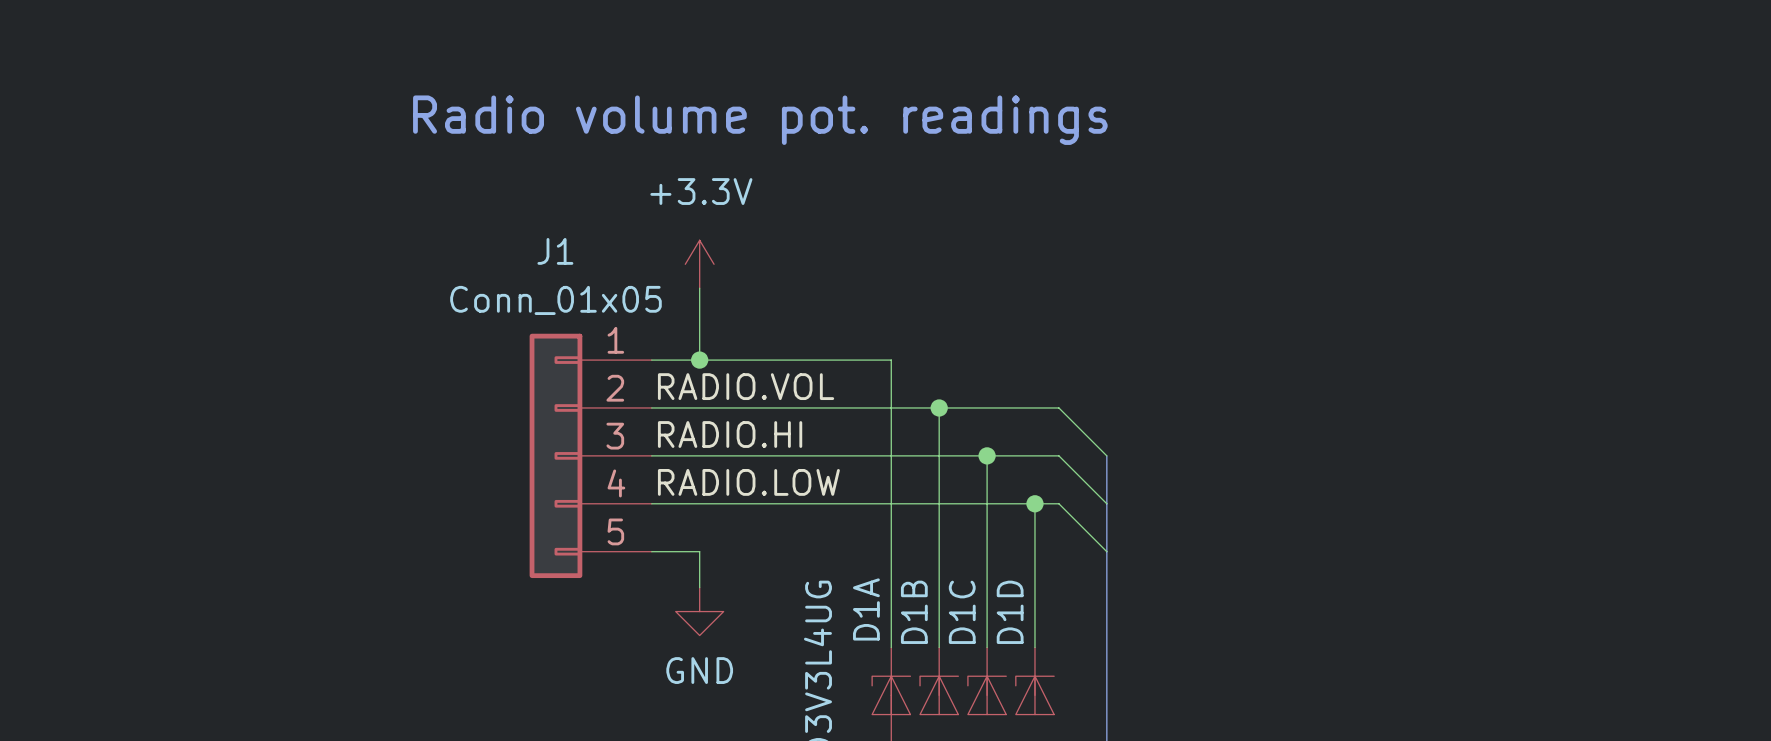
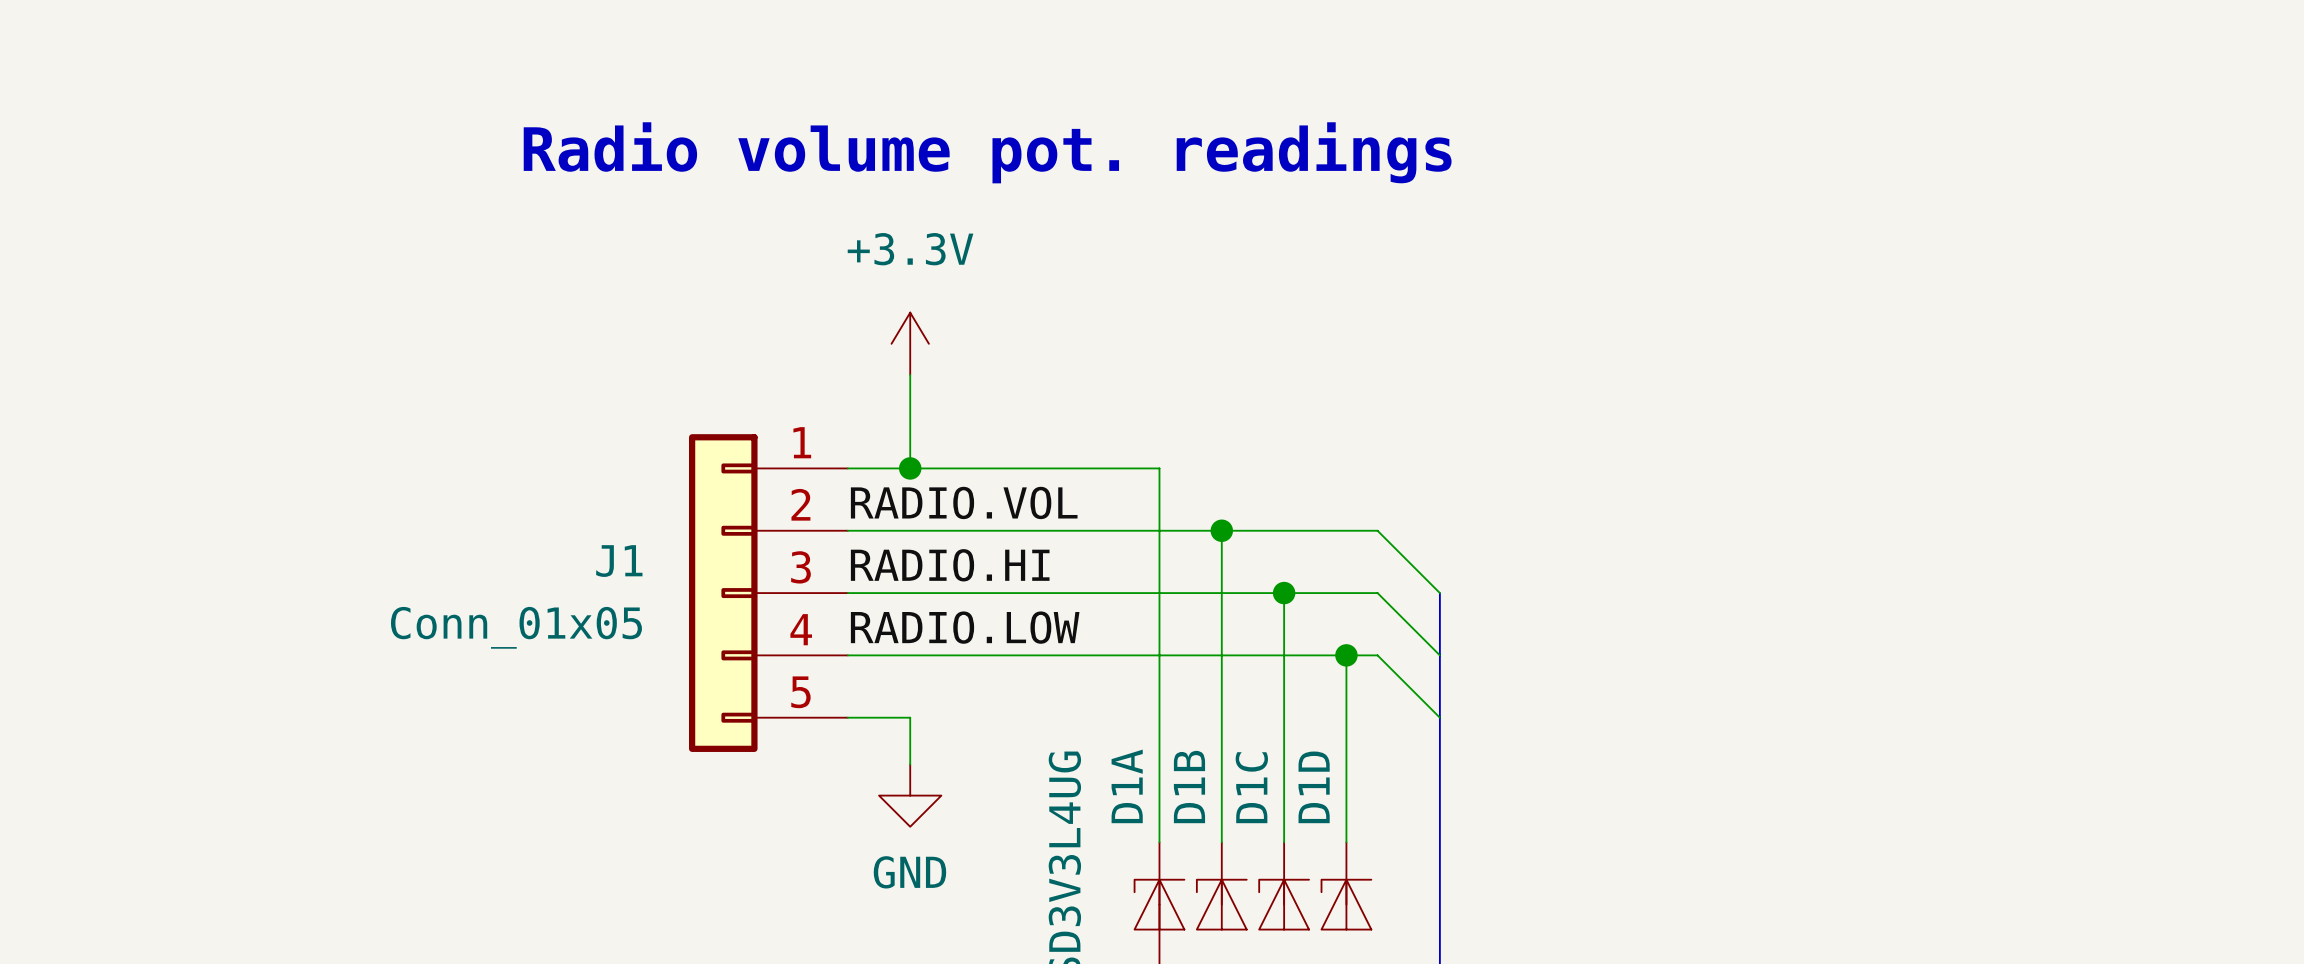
J1 name position: J1 (555, 251) -> J1 (619, 561)
J1 value position: Conn_01x05 (555, 300) -> Conn_01x05 (516, 627)

